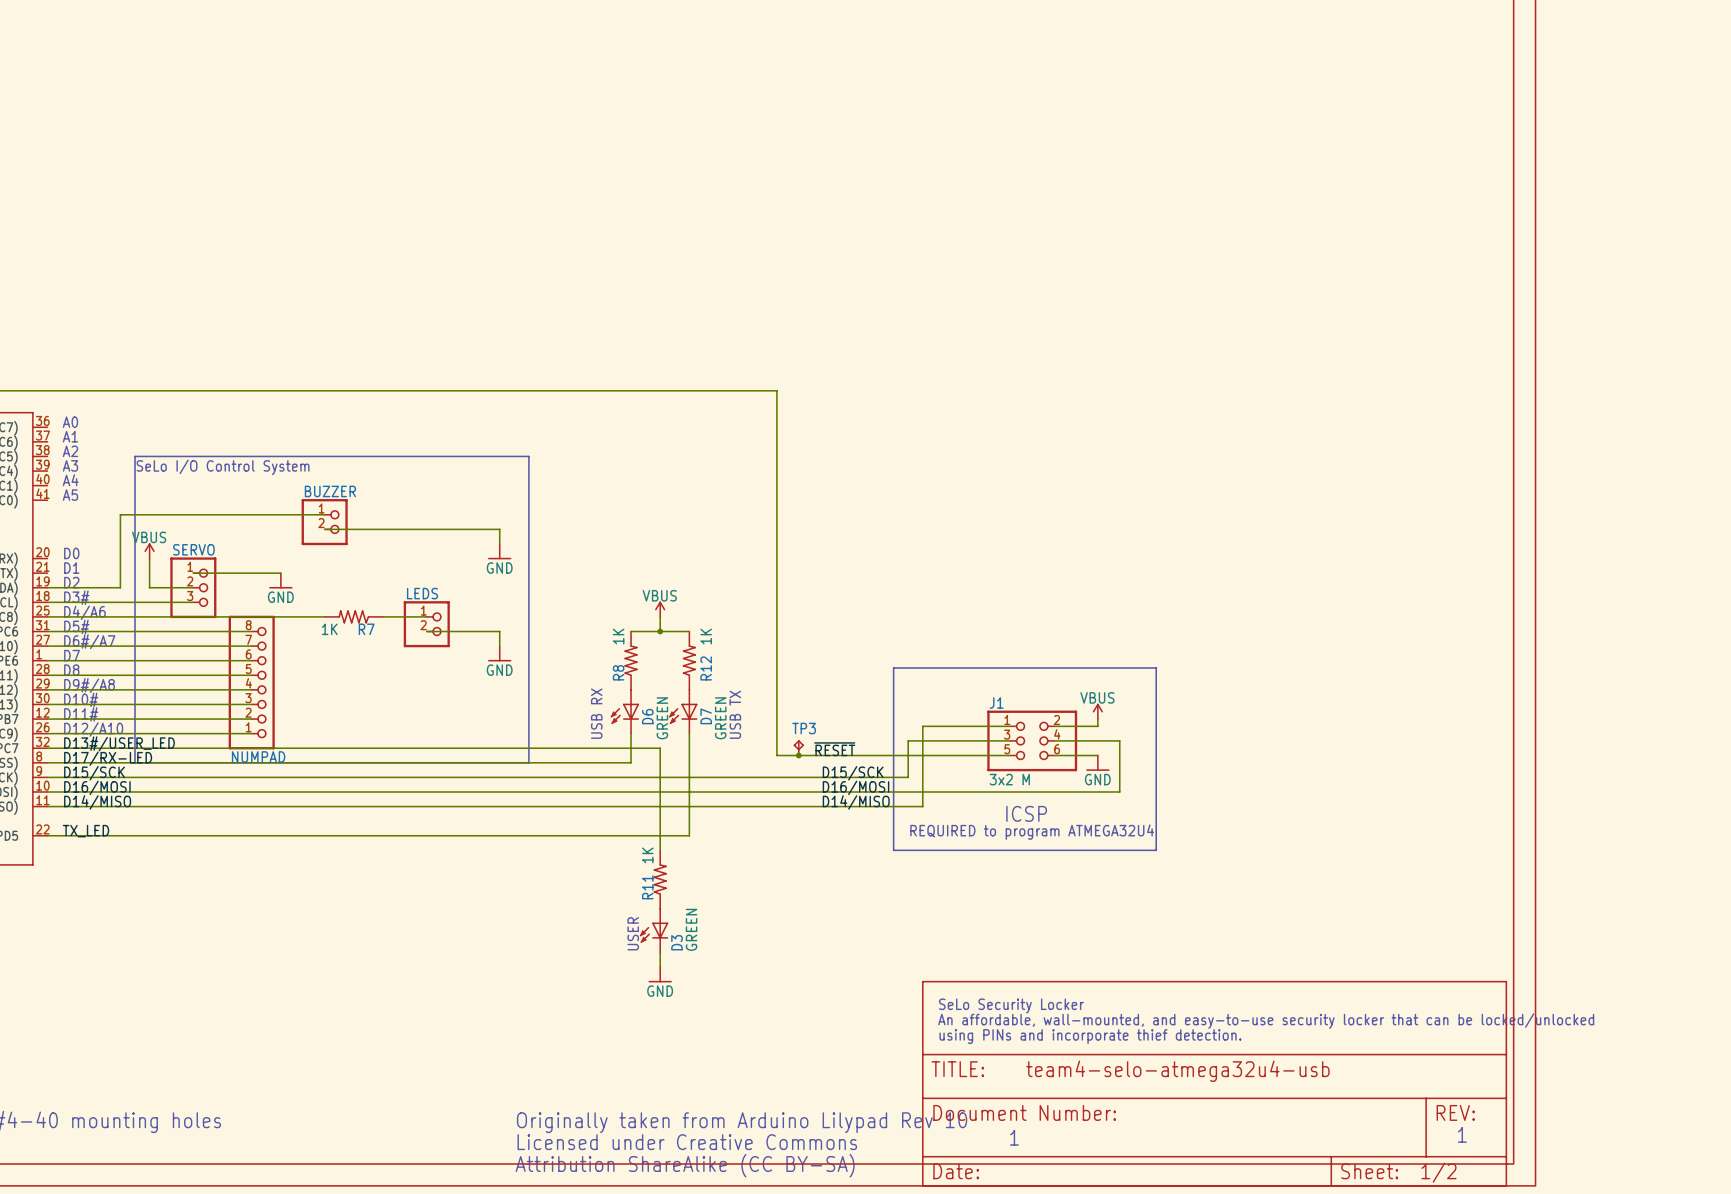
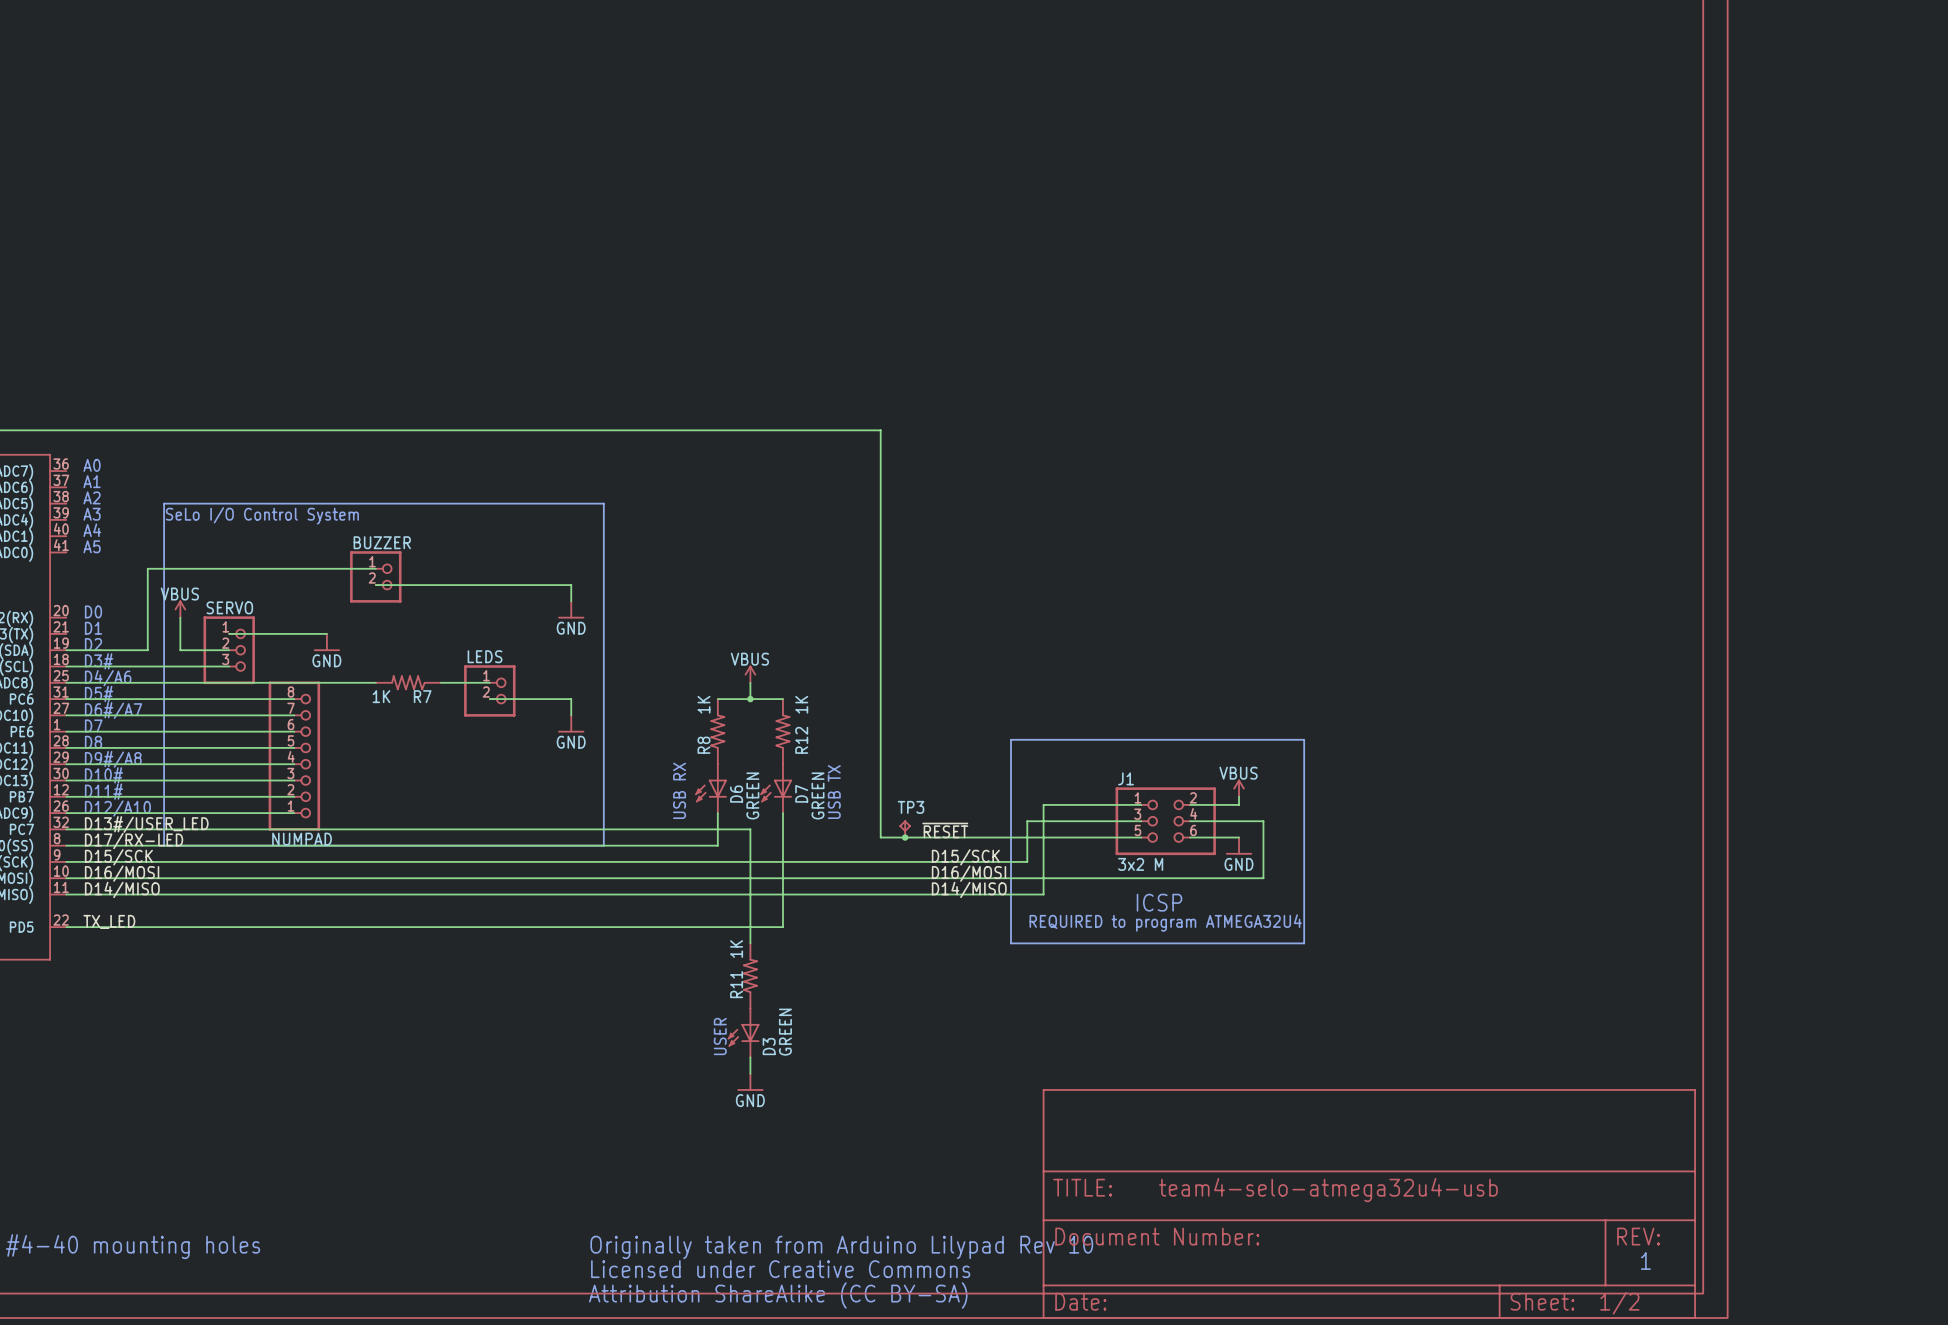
text: SeLo Security Locker (1011, 1005) -> none
text: An affordable, wall-mounted, and easy-to-use security locker that can be locked/unlocked (1266, 1021) -> none
text: using PINs and incorporate thief detection. (1090, 1036) -> none
text: 1 (1014, 1137) -> none

